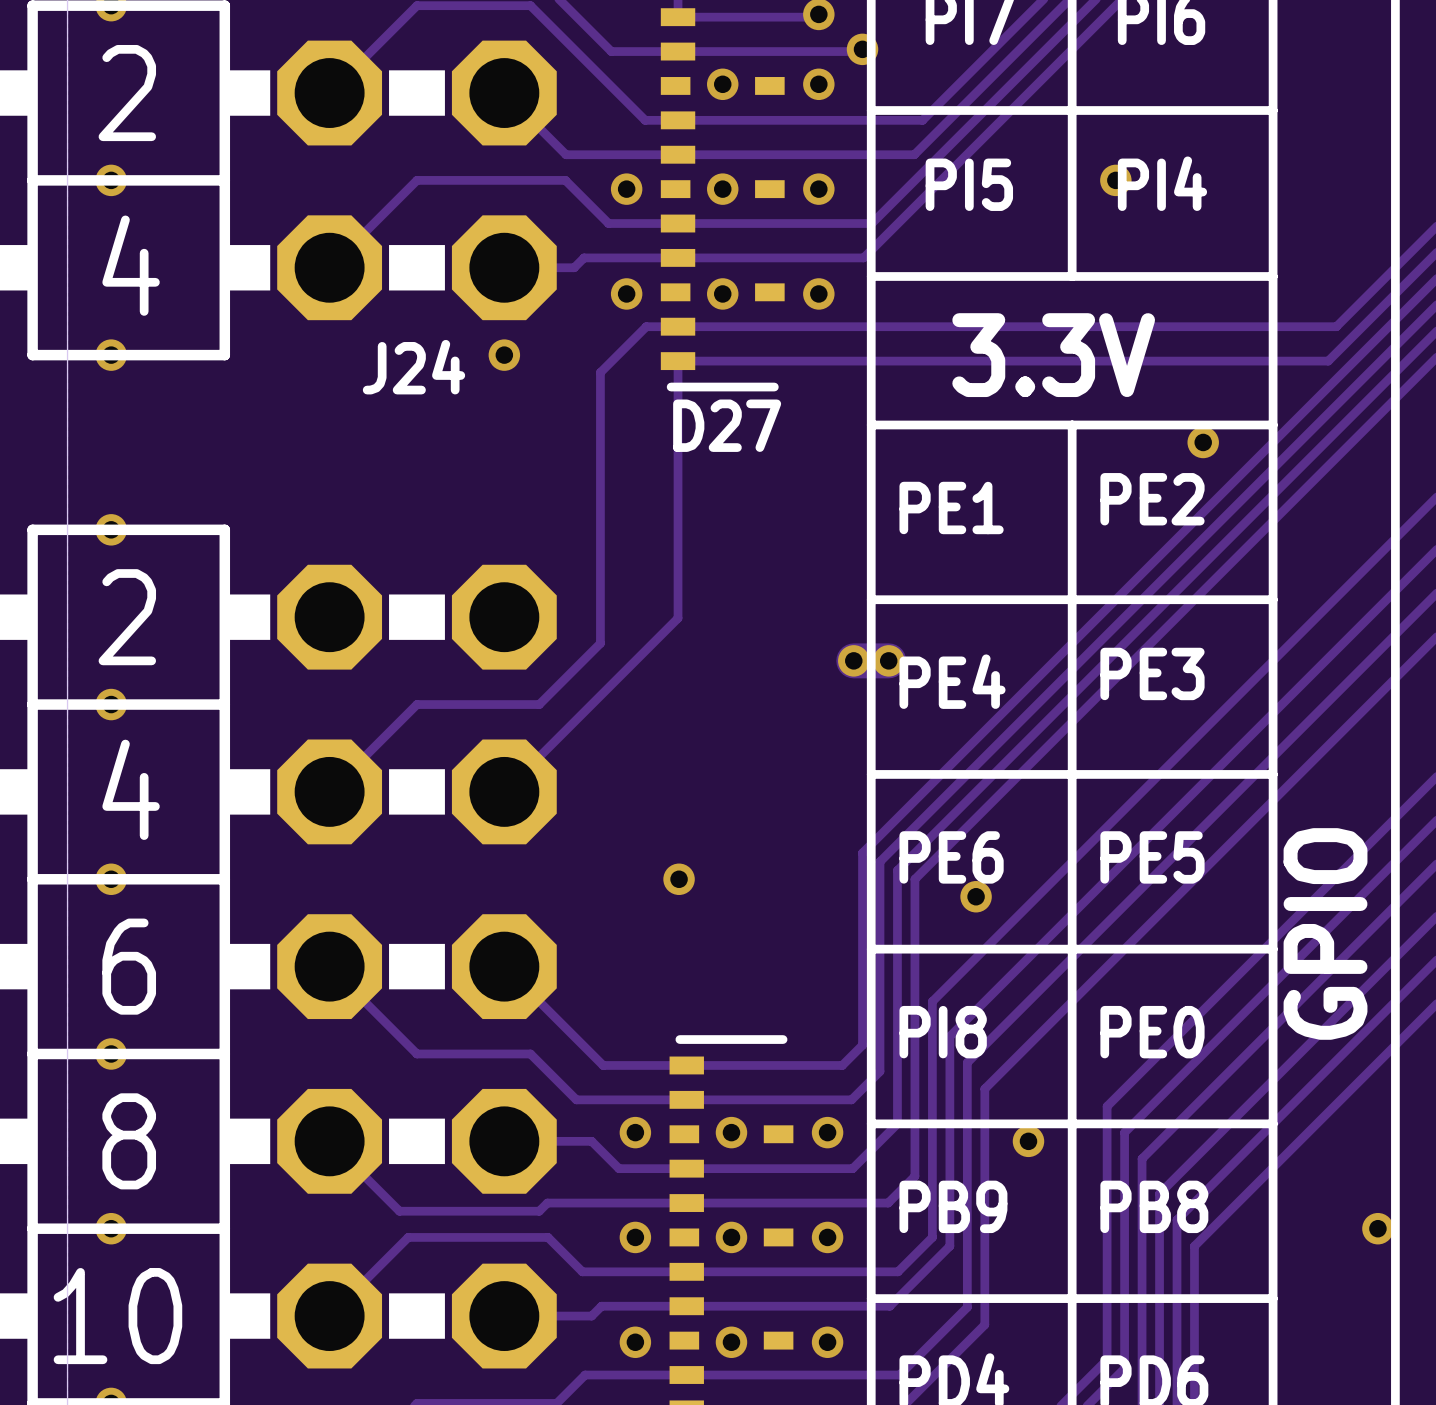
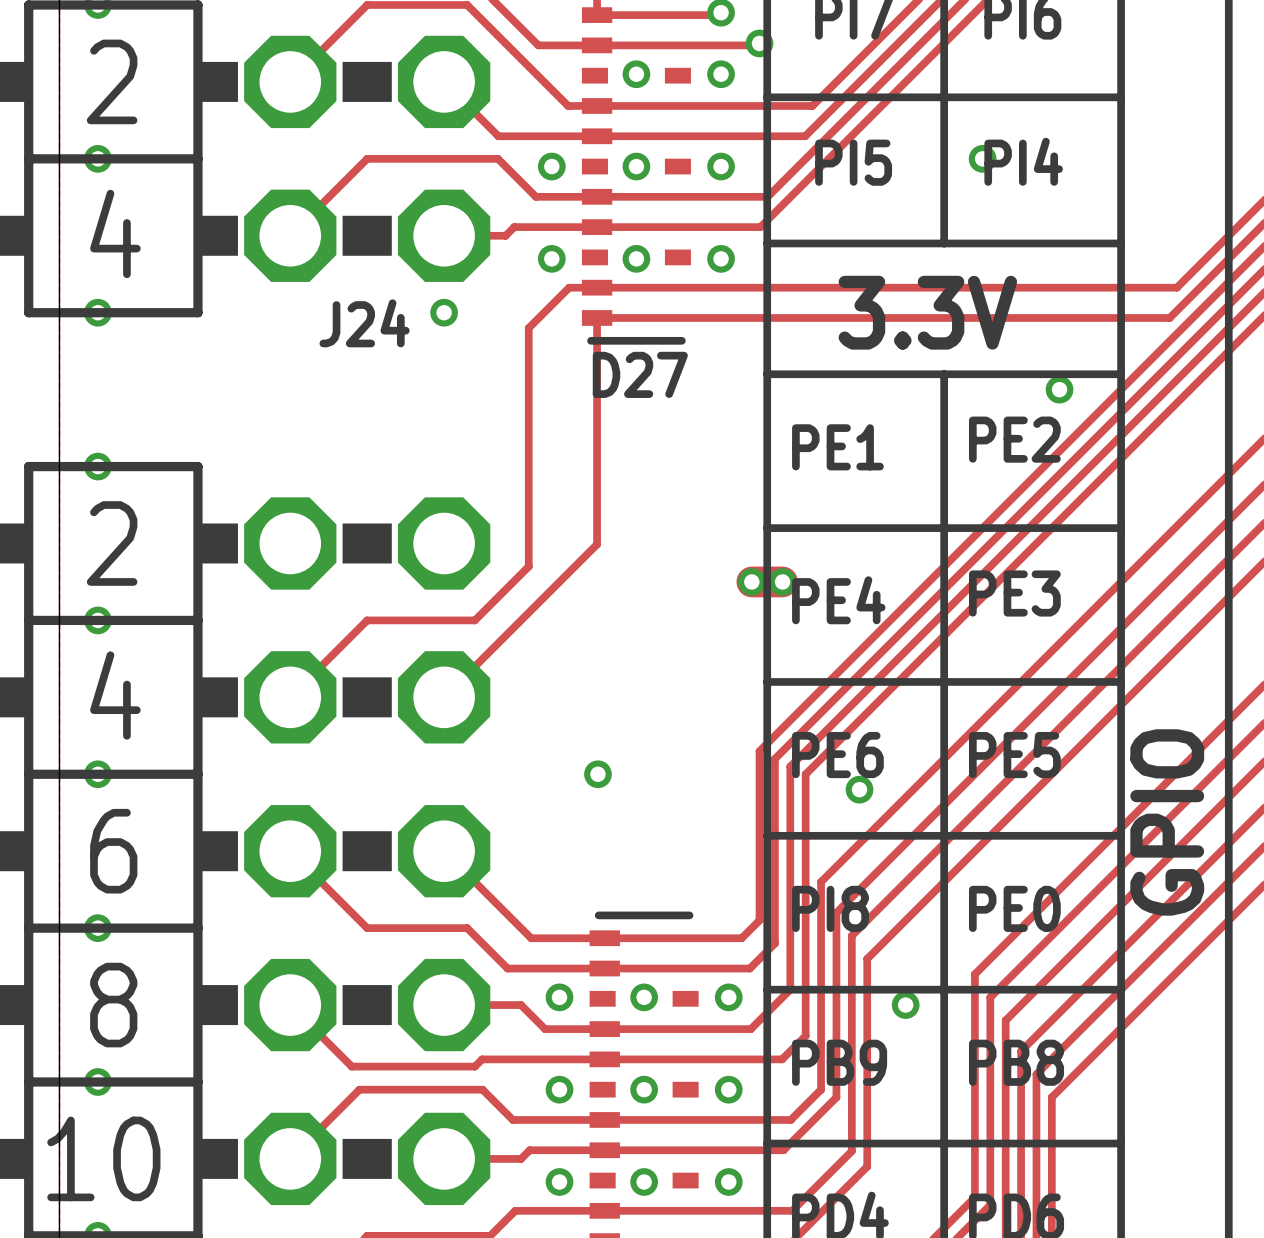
via: (1377, 1228) -> none

